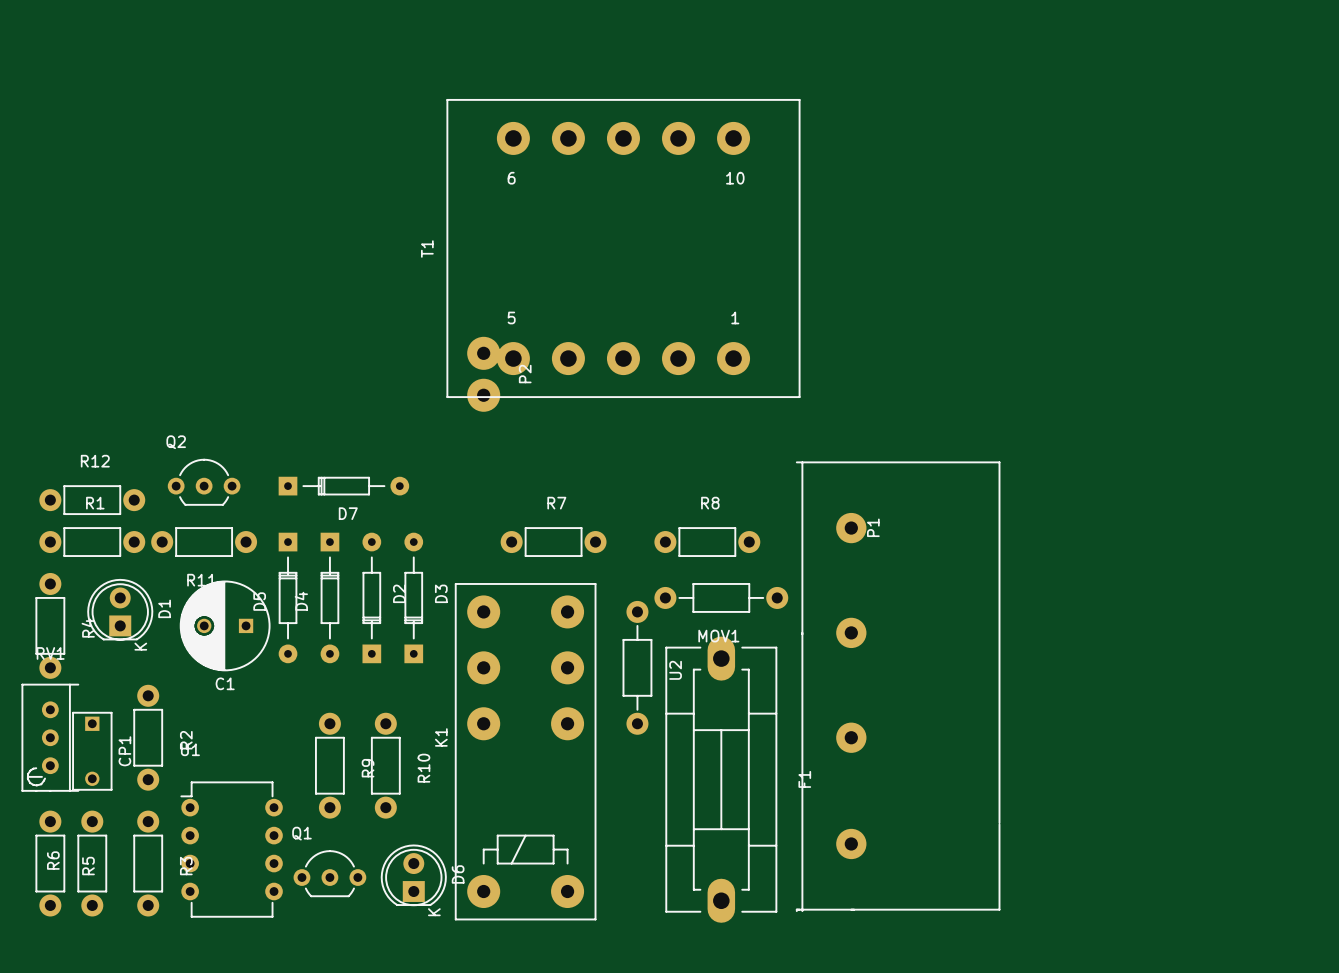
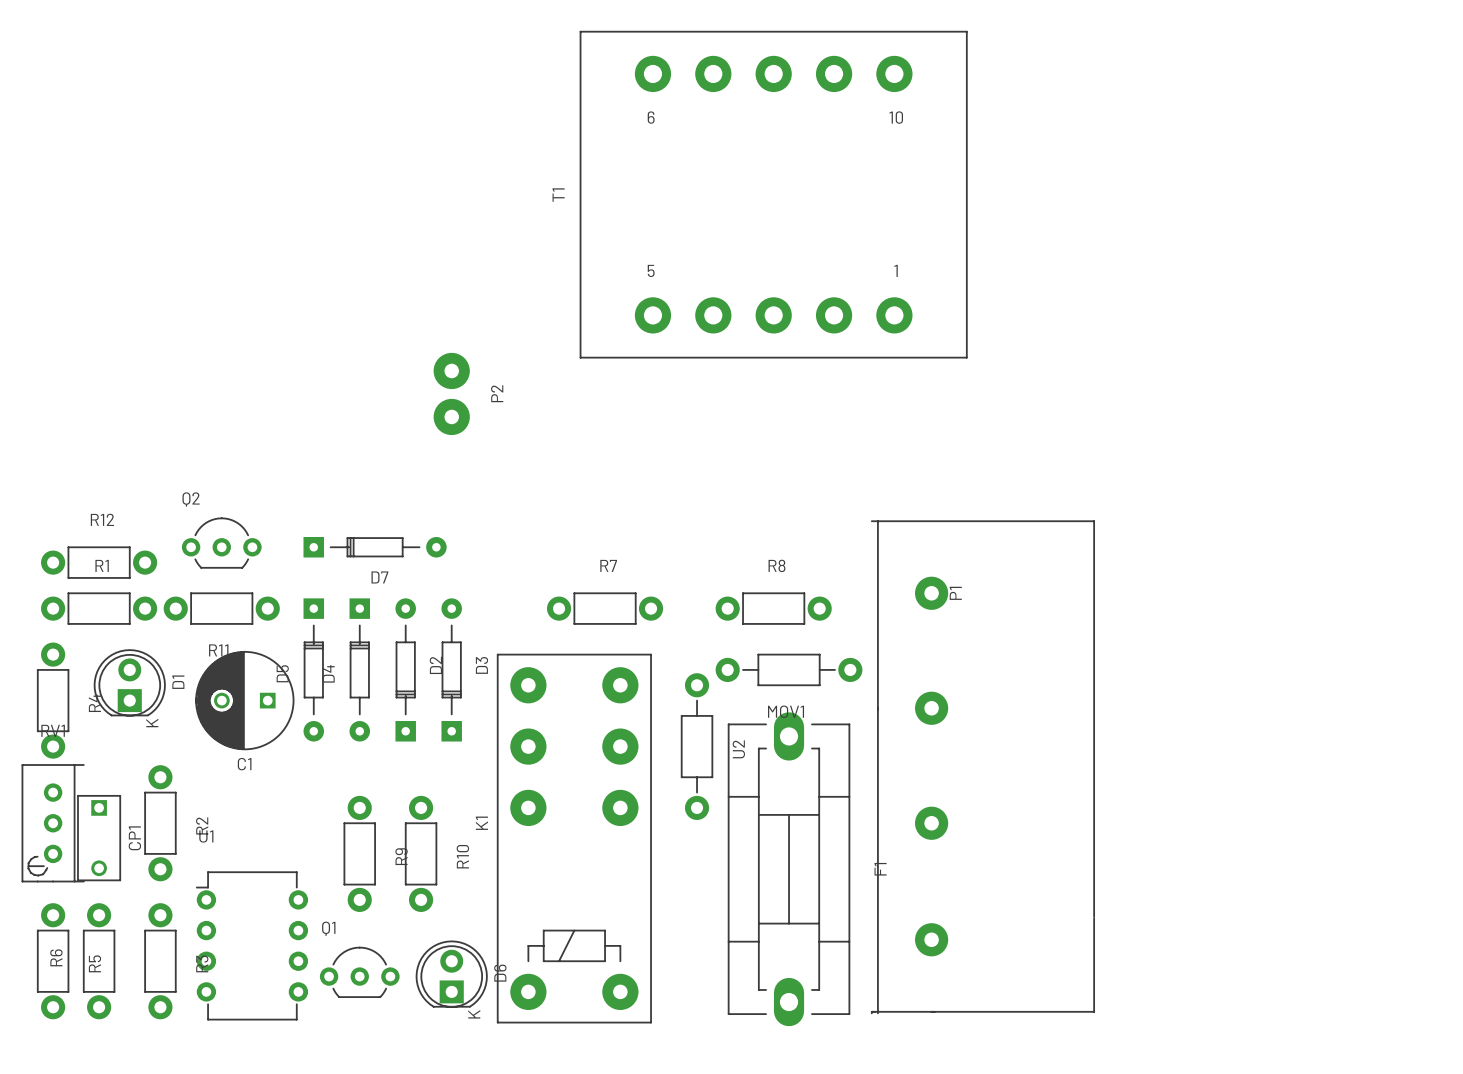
T1 position: (623, 248) -> (773, 194)
P2 position: (483, 374) -> (451, 393)

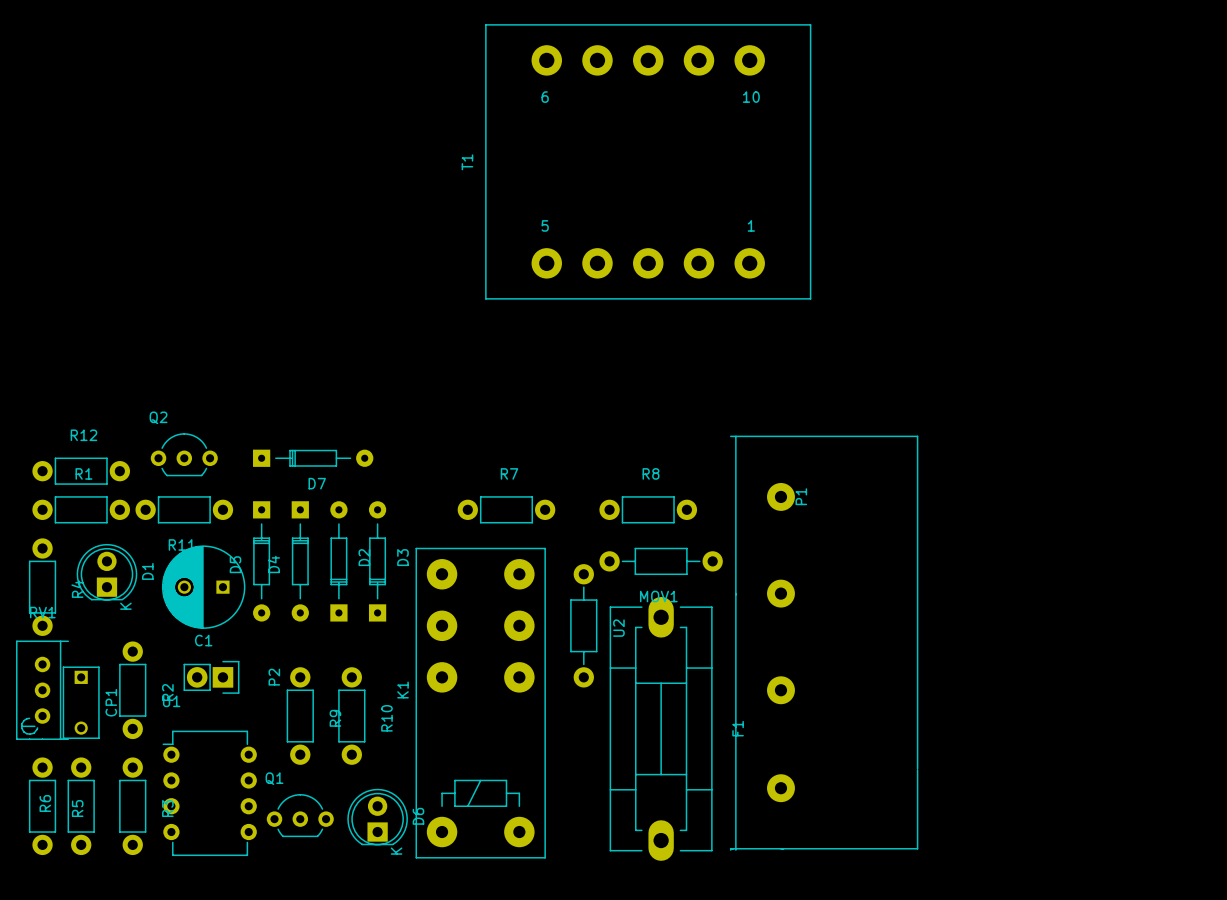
P2 footprint: [433, 352, 470, 436] -> [183, 660, 240, 694]
P2 name position: P2 (497, 393) -> P2 (274, 677)

